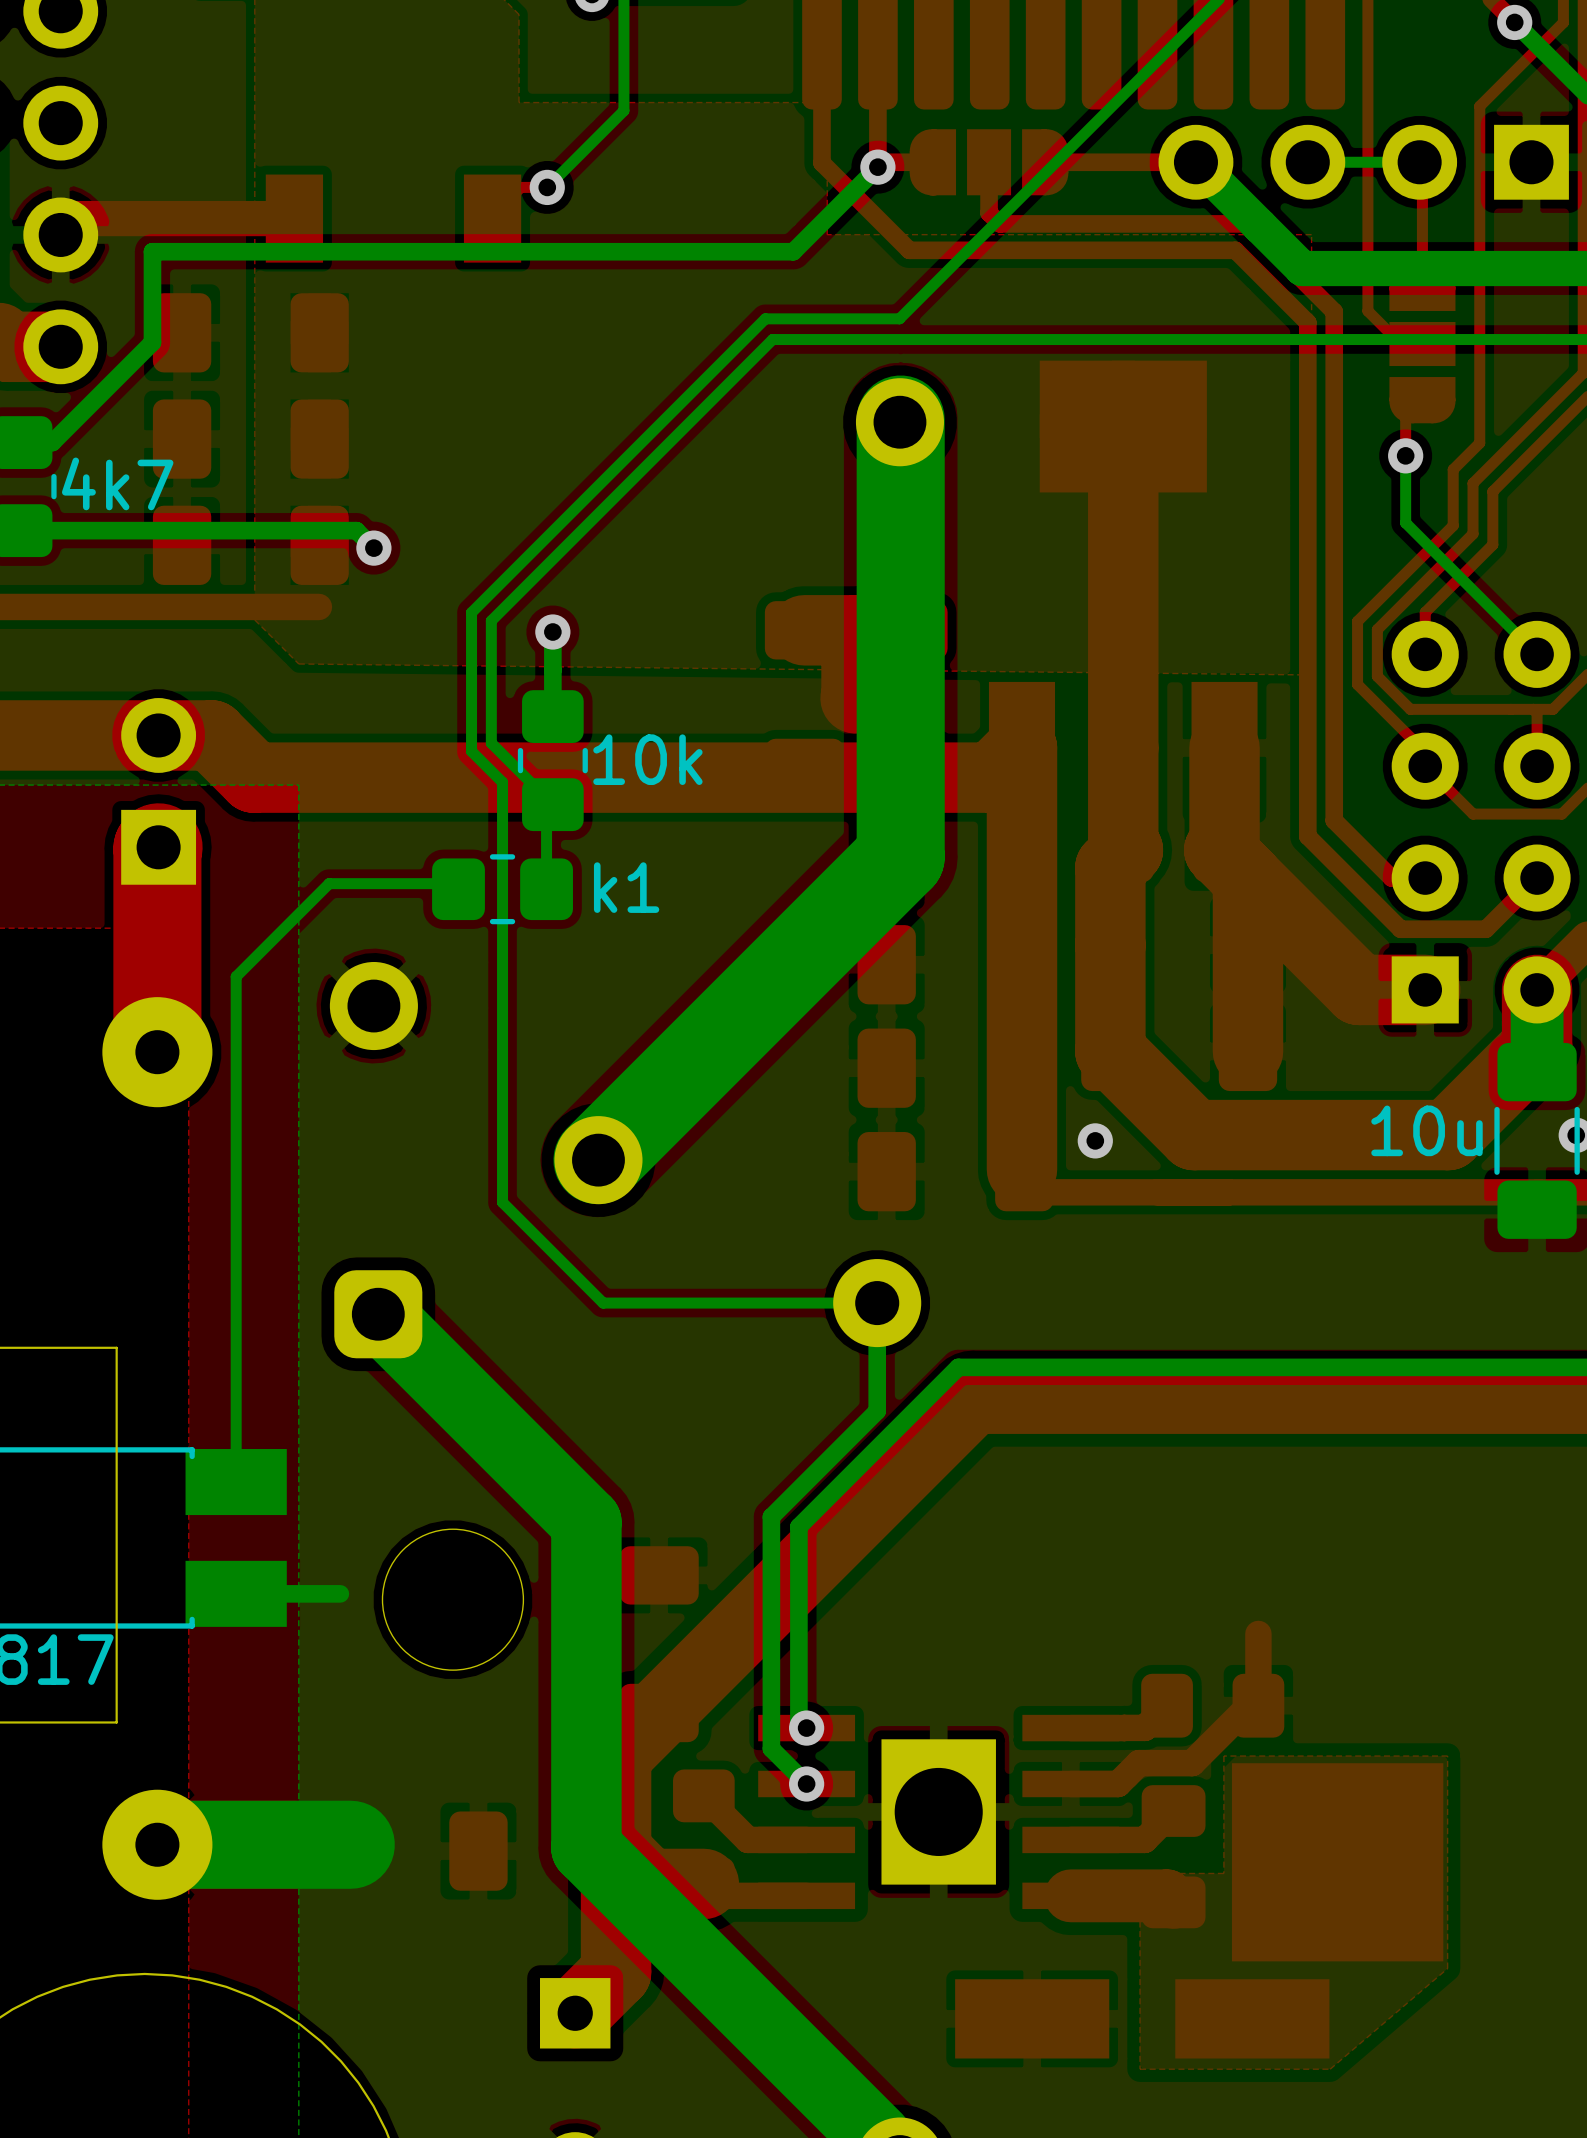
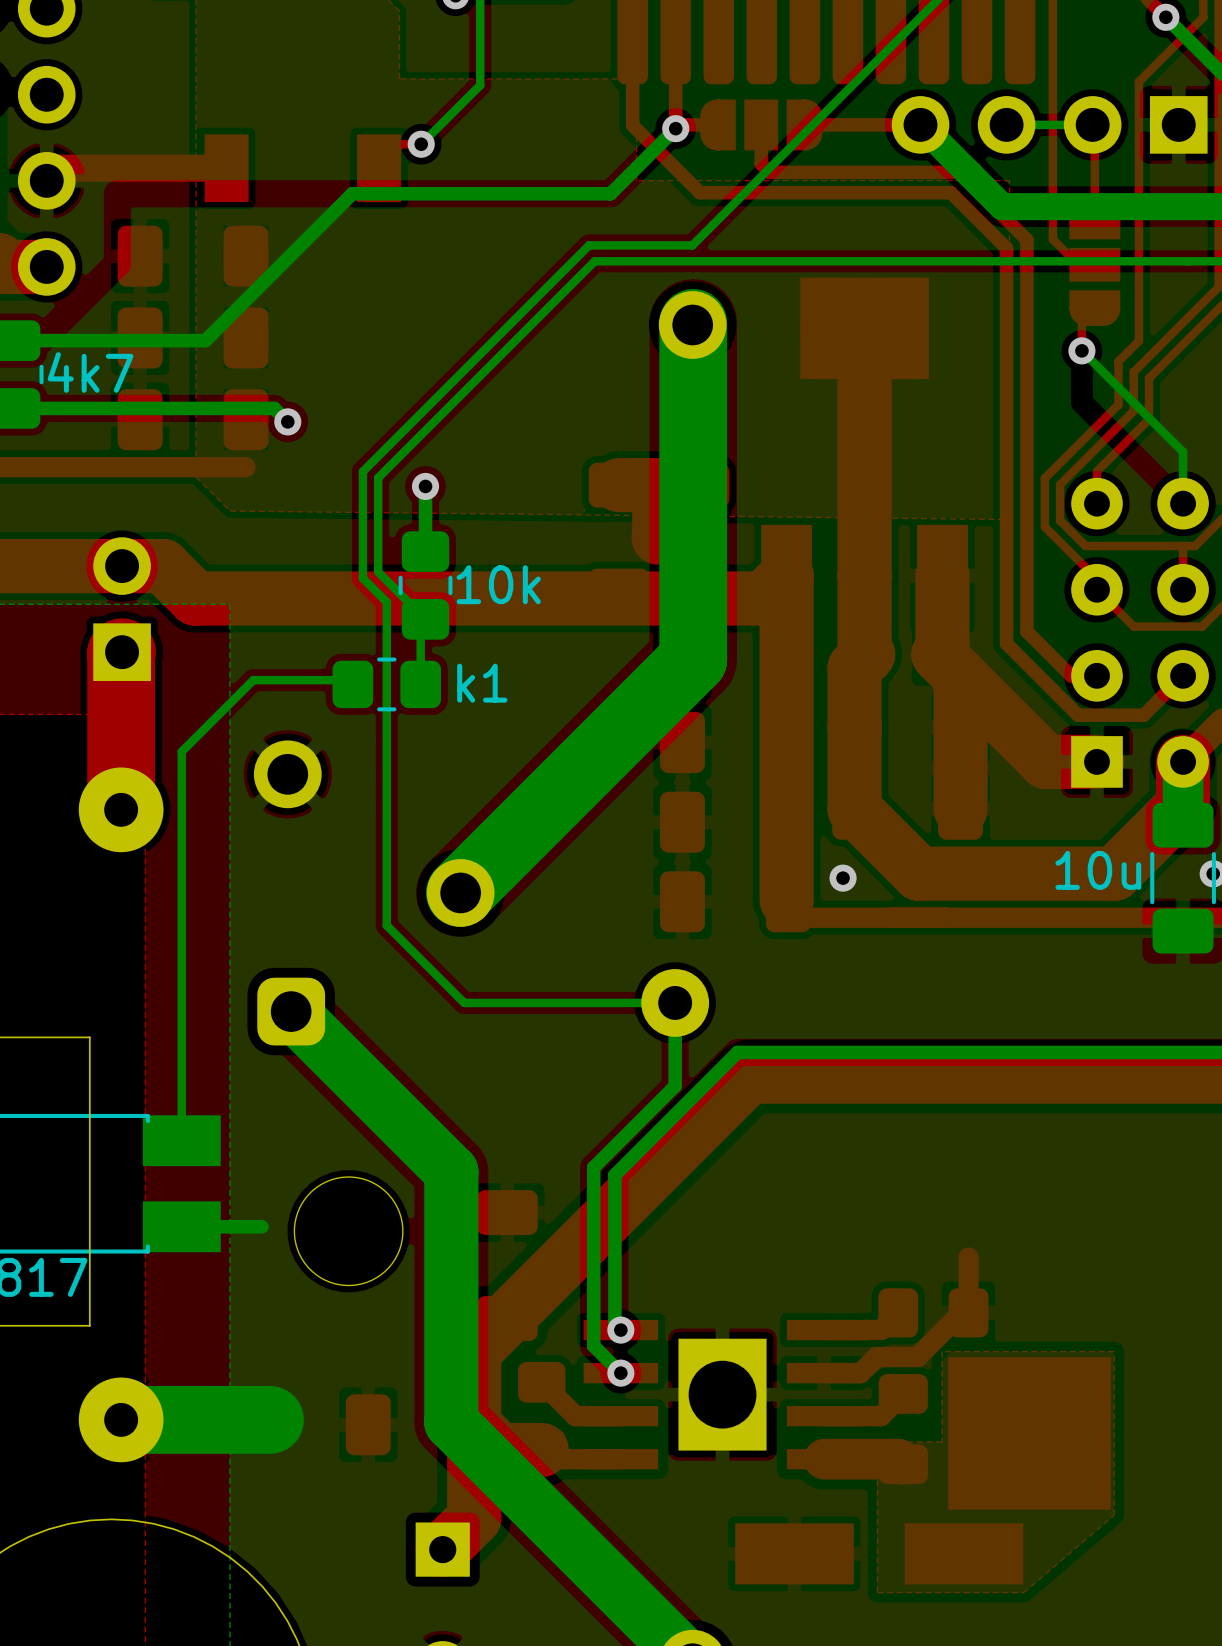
bottom track: (457, 251) (152, 251) (152, 342) (52, 442) -> (352, 193) (205, 340) (40, 340)
bottom track: (1405, 455) (1405, 522) (1537, 654) -> (1081, 350) (1183, 452) (1183, 503)

